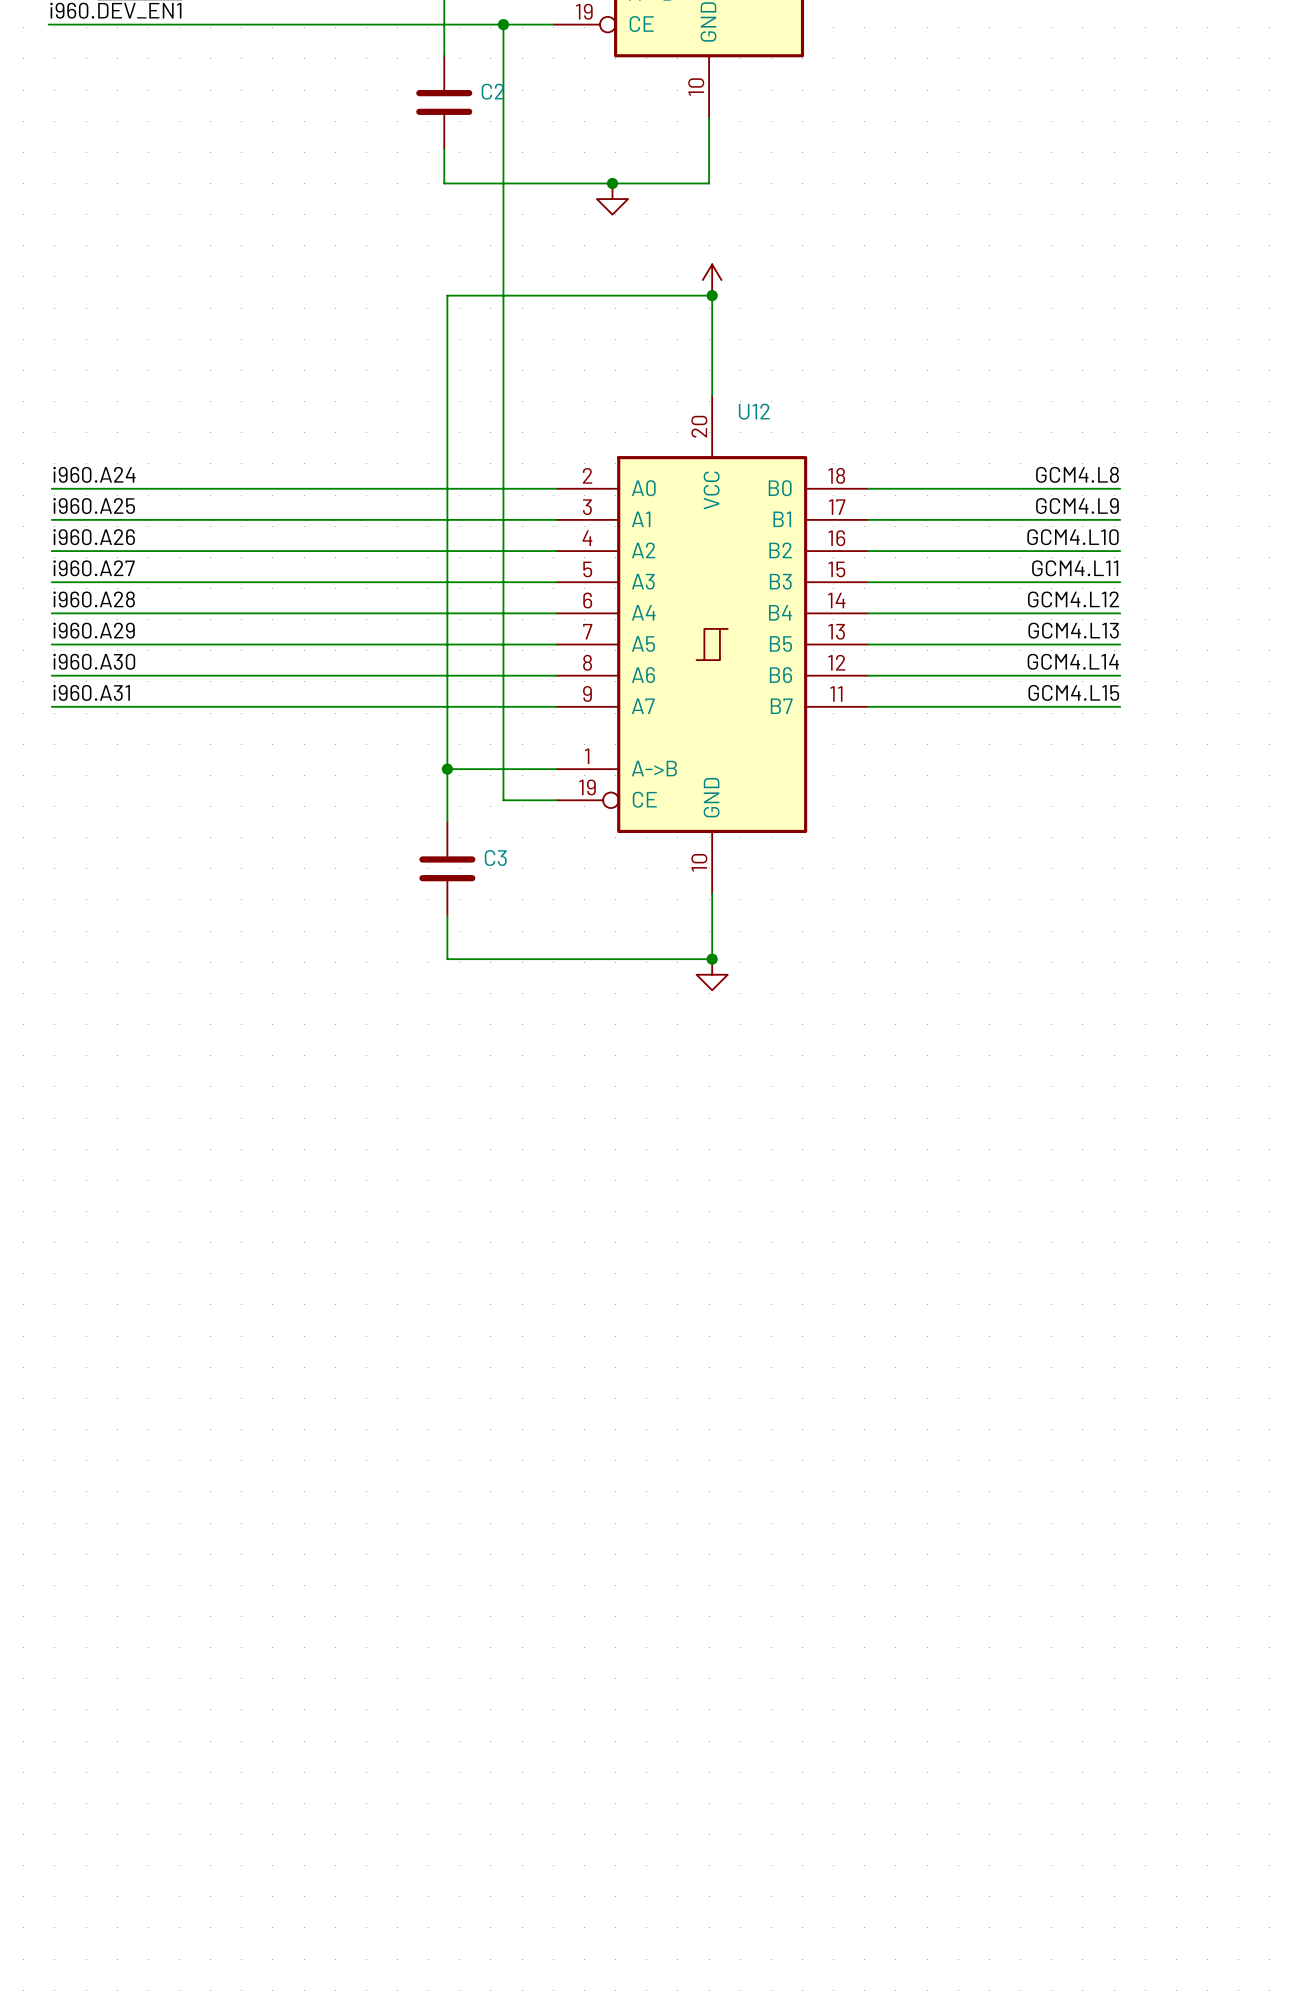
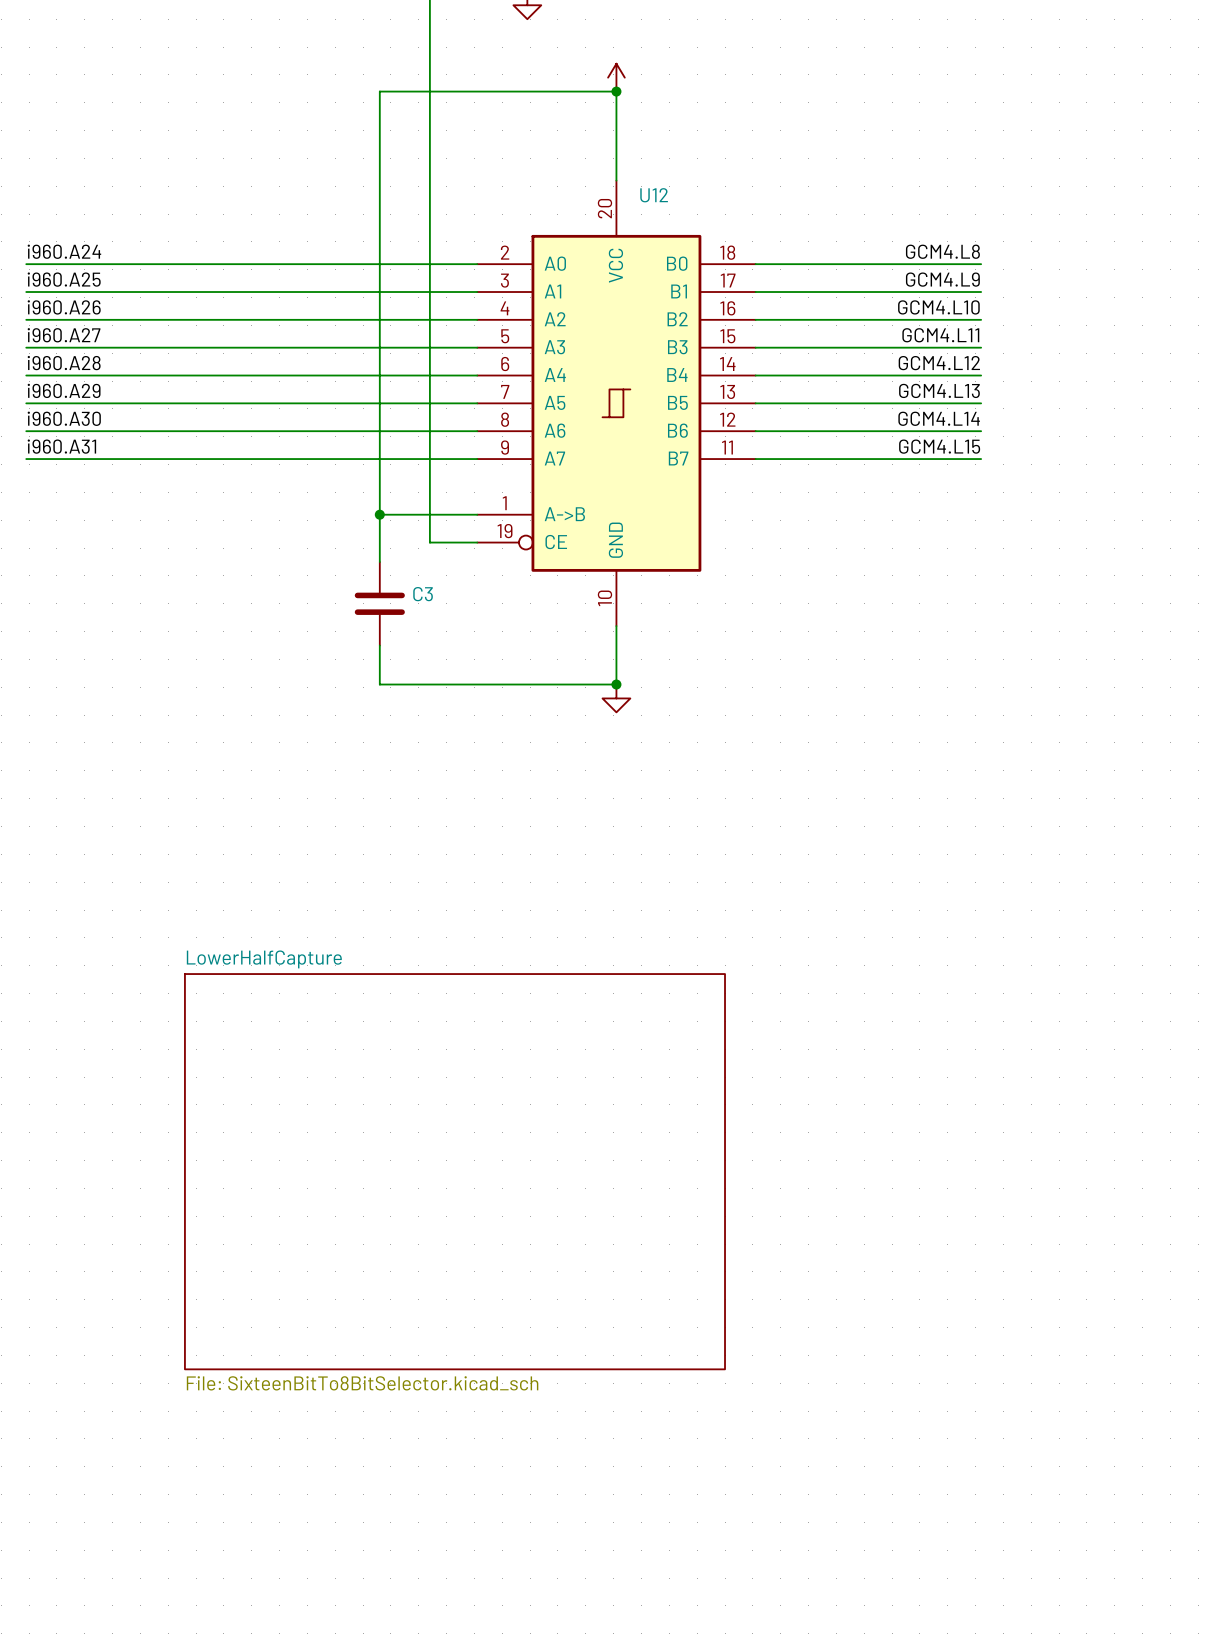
sheet LowerHalfCapture: none -> File: SixteenBitTo8BitSelector.kicad_sch (454, 1171)

